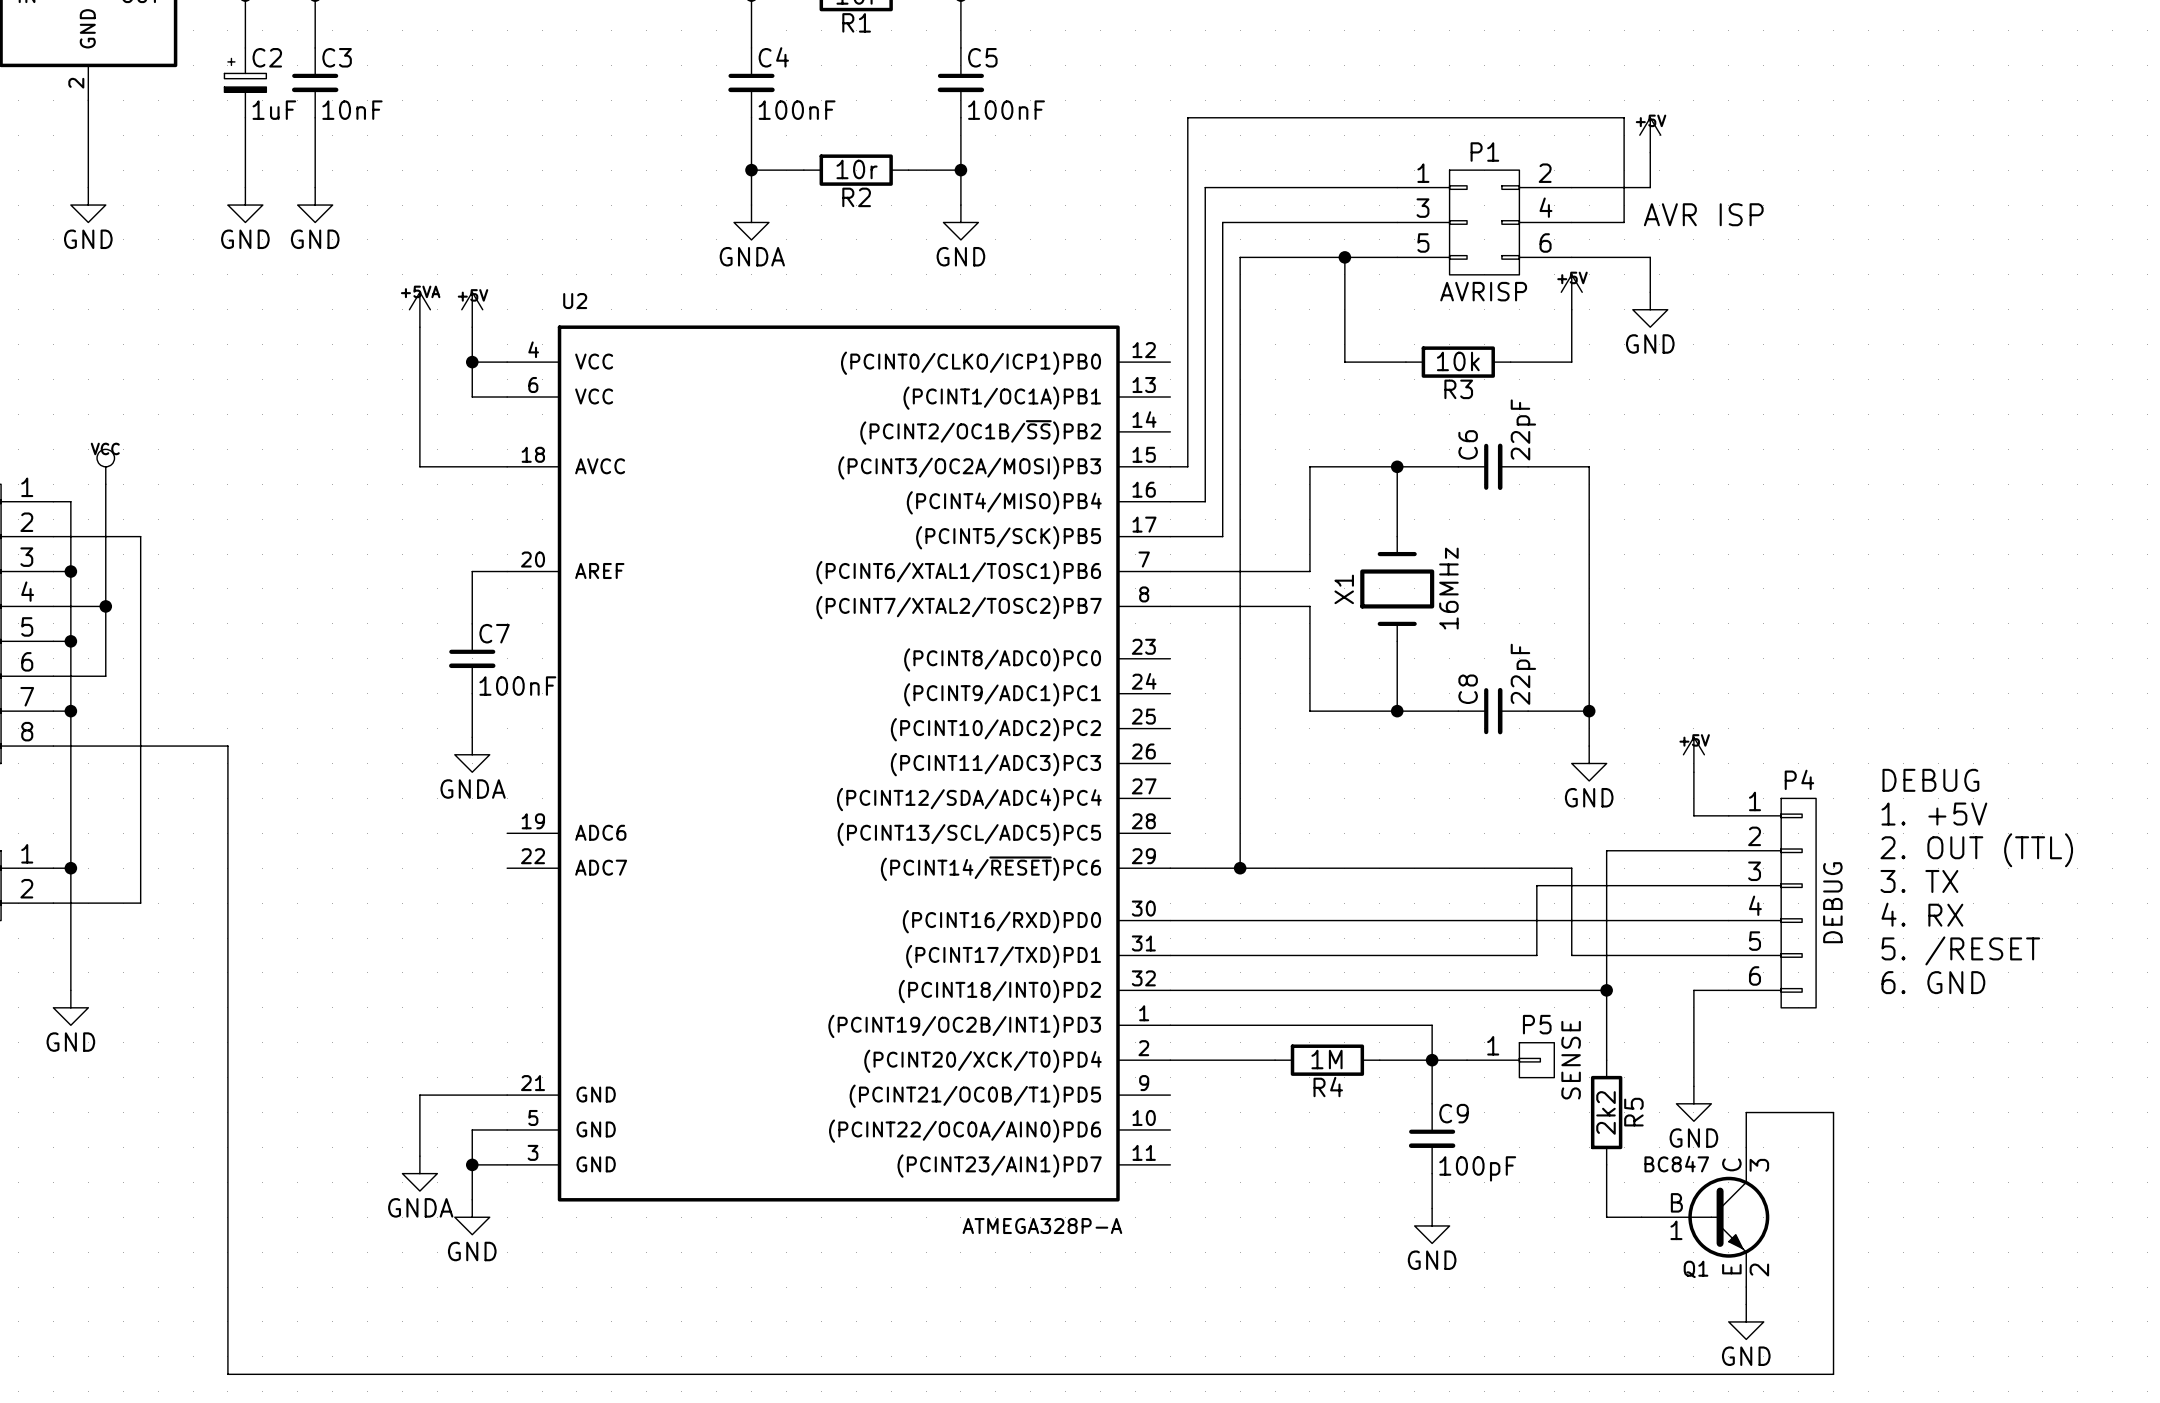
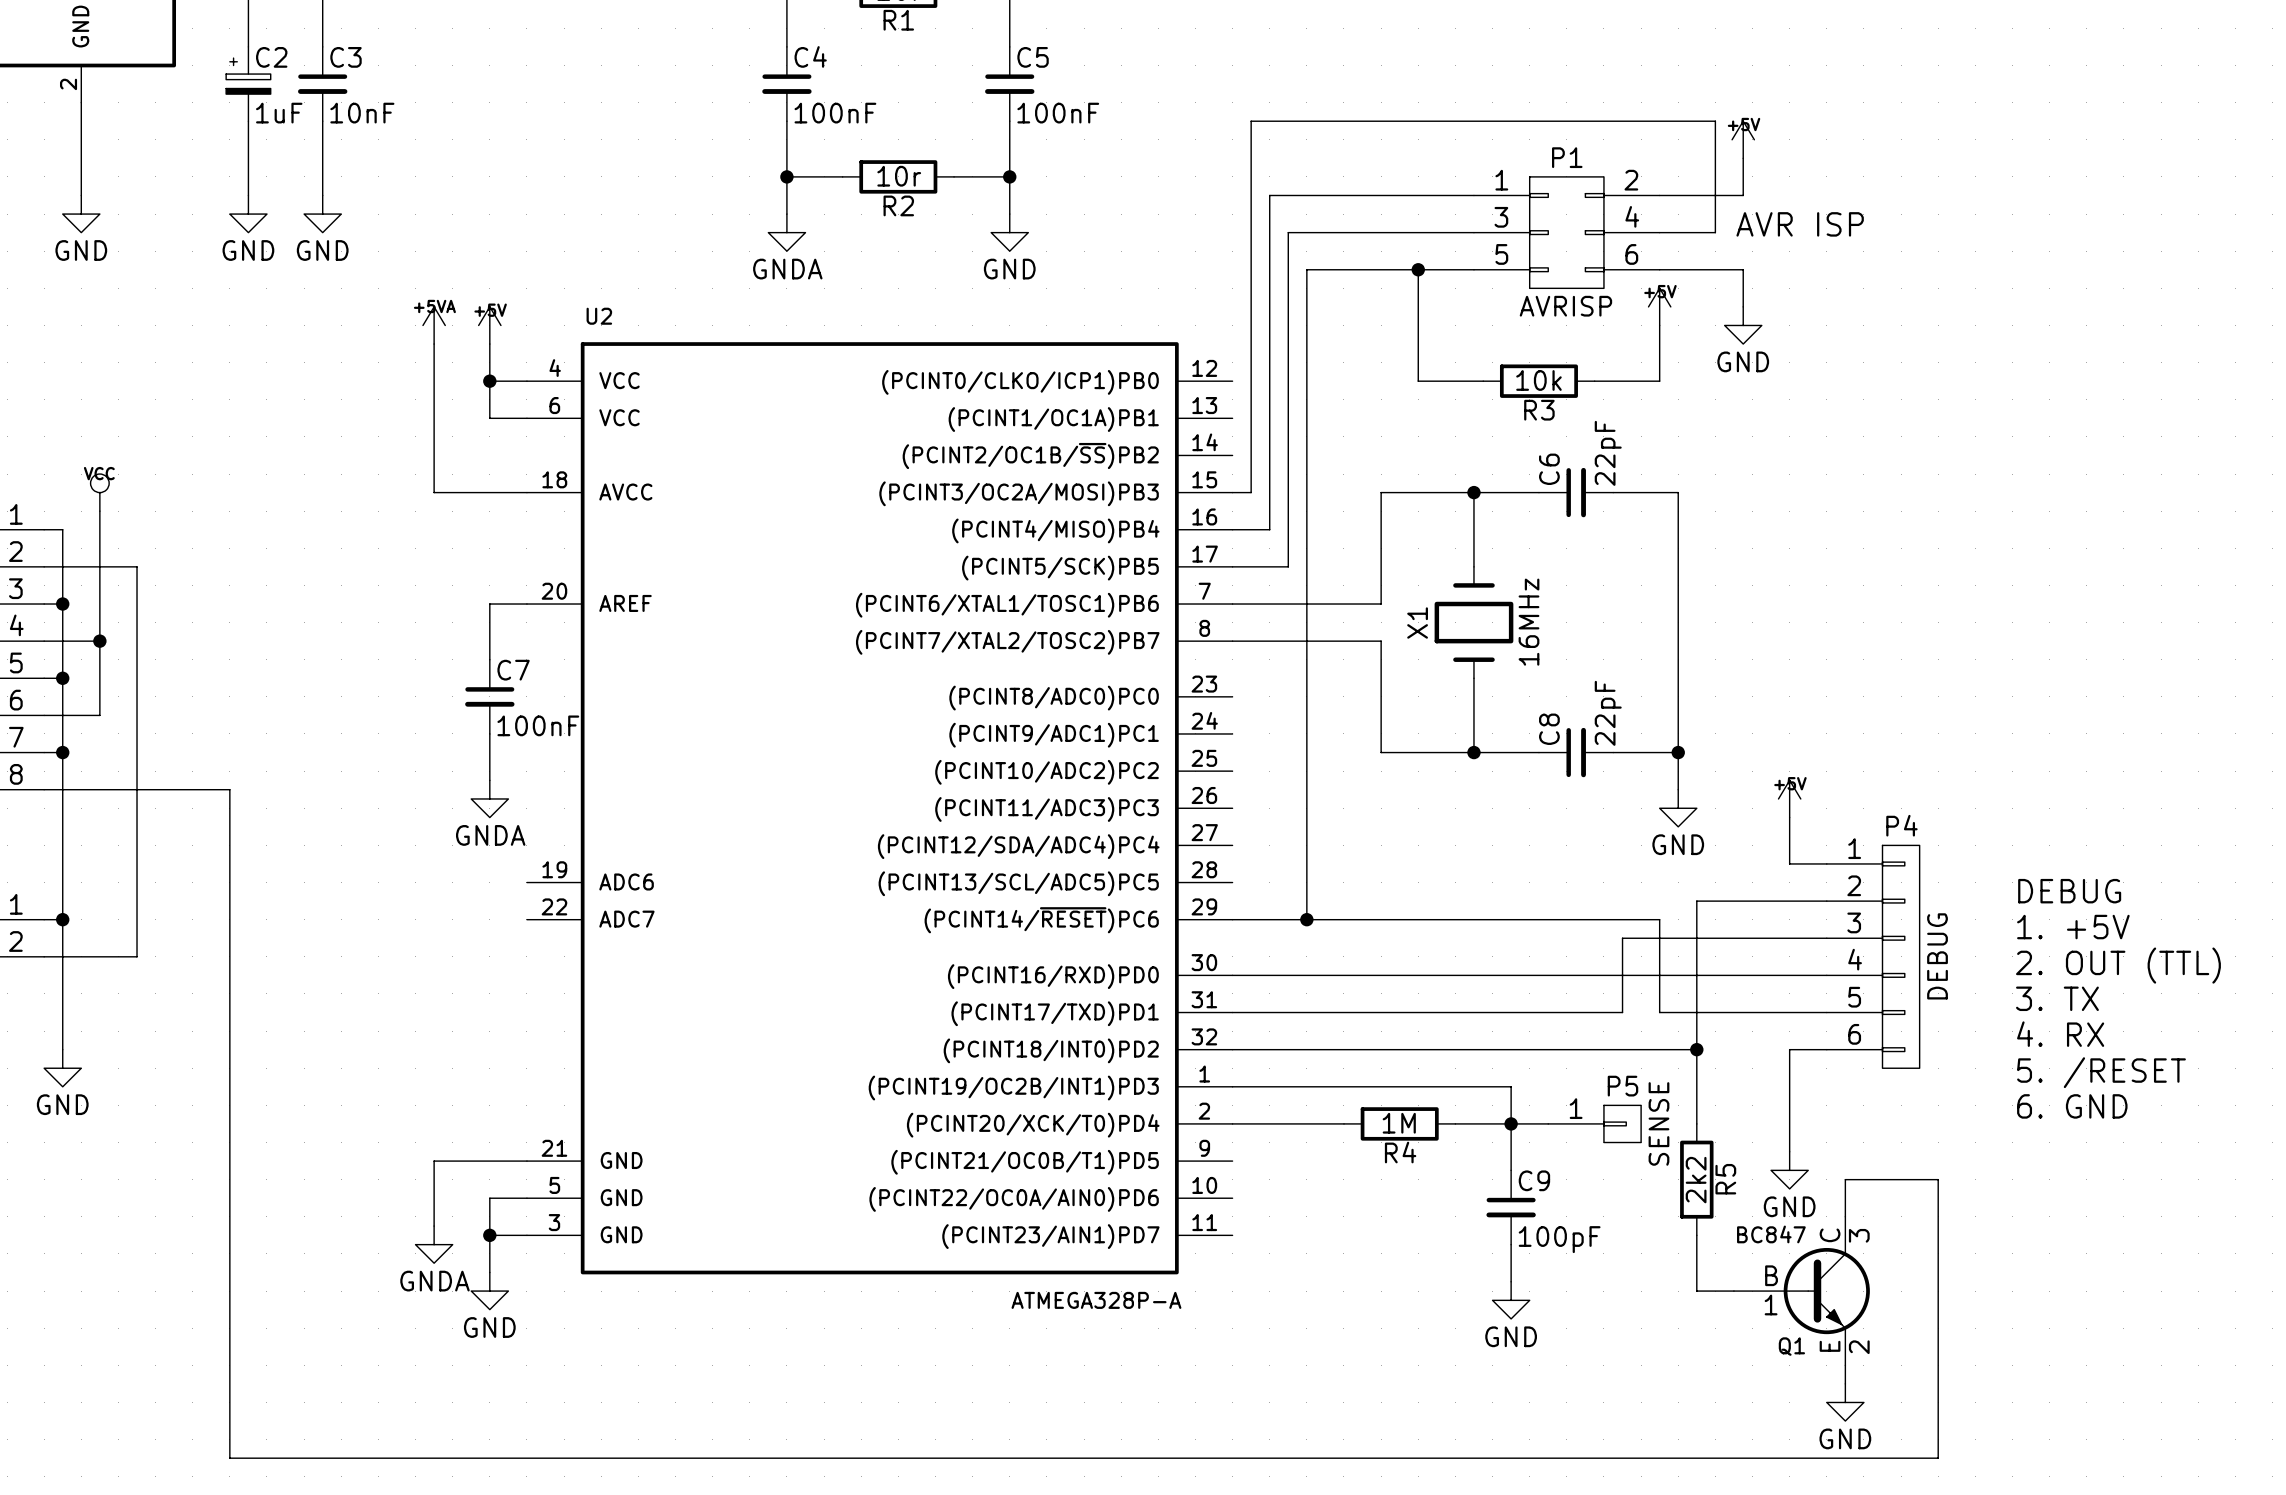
text position: DEBUG (1930, 780) -> DEBUG (2069, 891)
text position: 1. +5V (1934, 814) -> 1. +5V (2073, 927)
text position: 2. OUT (TTL) (1976, 850) -> 2. OUT (TTL) (2118, 965)
text position: 3. TX (1919, 881) -> 3. TX (2057, 998)
text position: 4. RX (1922, 914) -> 4. RX (2060, 1034)
text position: 5. /RESET (1960, 950) -> 5. /RESET (2101, 1072)
text position: 6. GND (1933, 982) -> 6. GND (2072, 1106)

